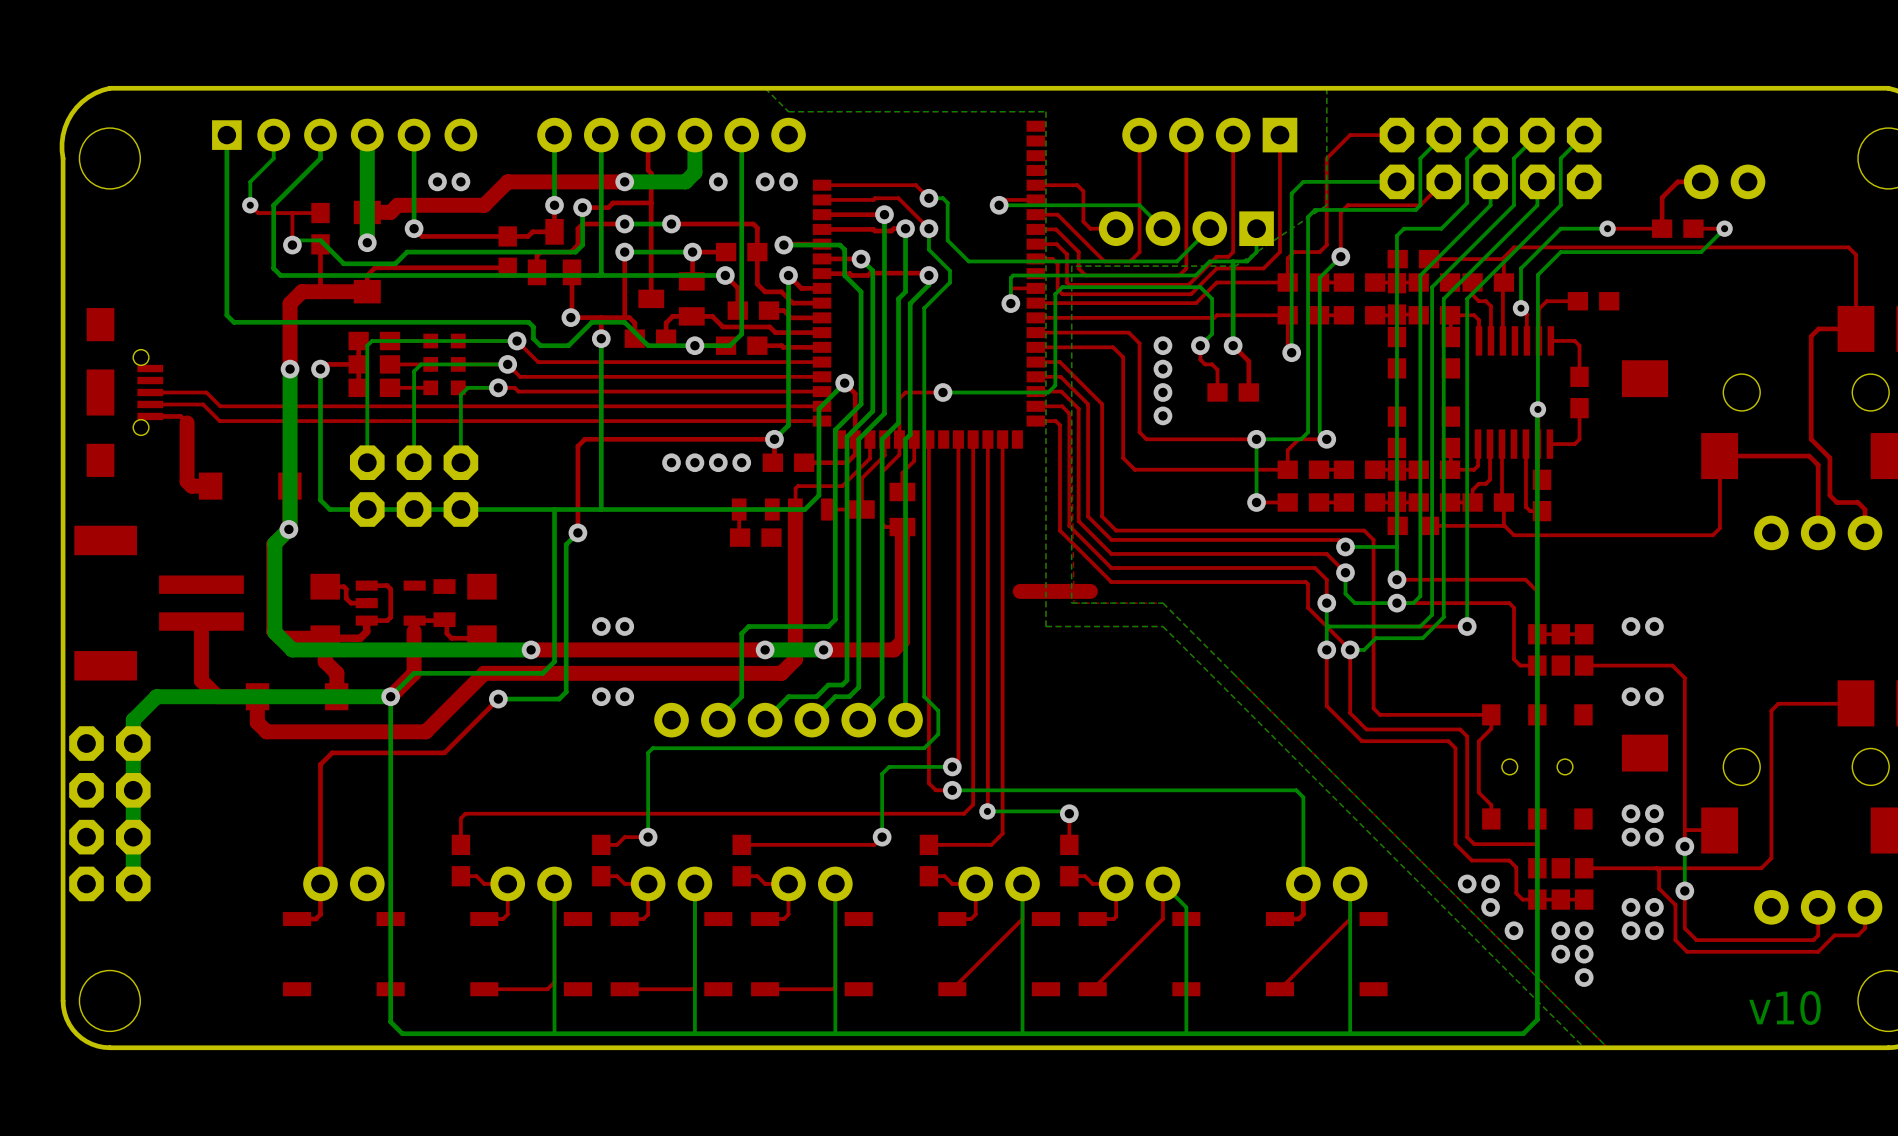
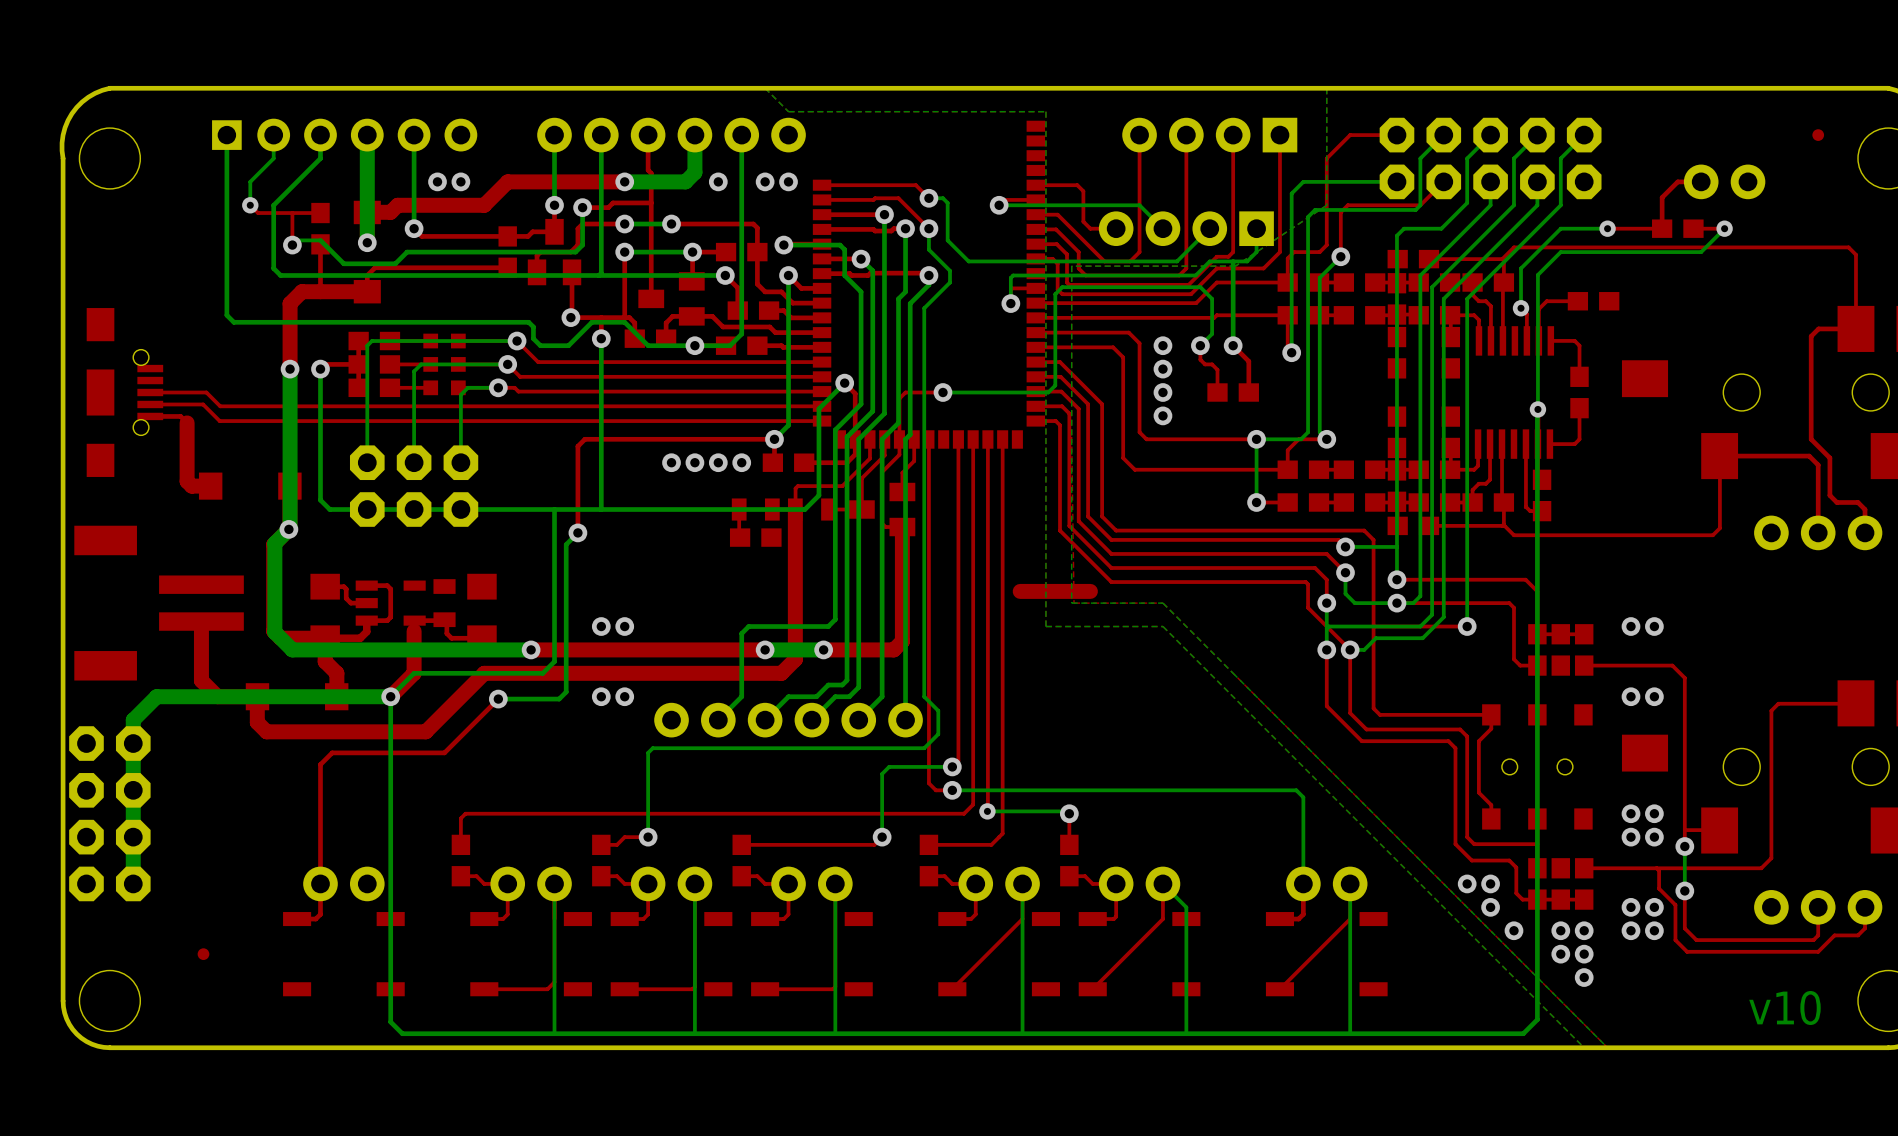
part: none -> (1818, 135)
part: none -> (203, 954)

